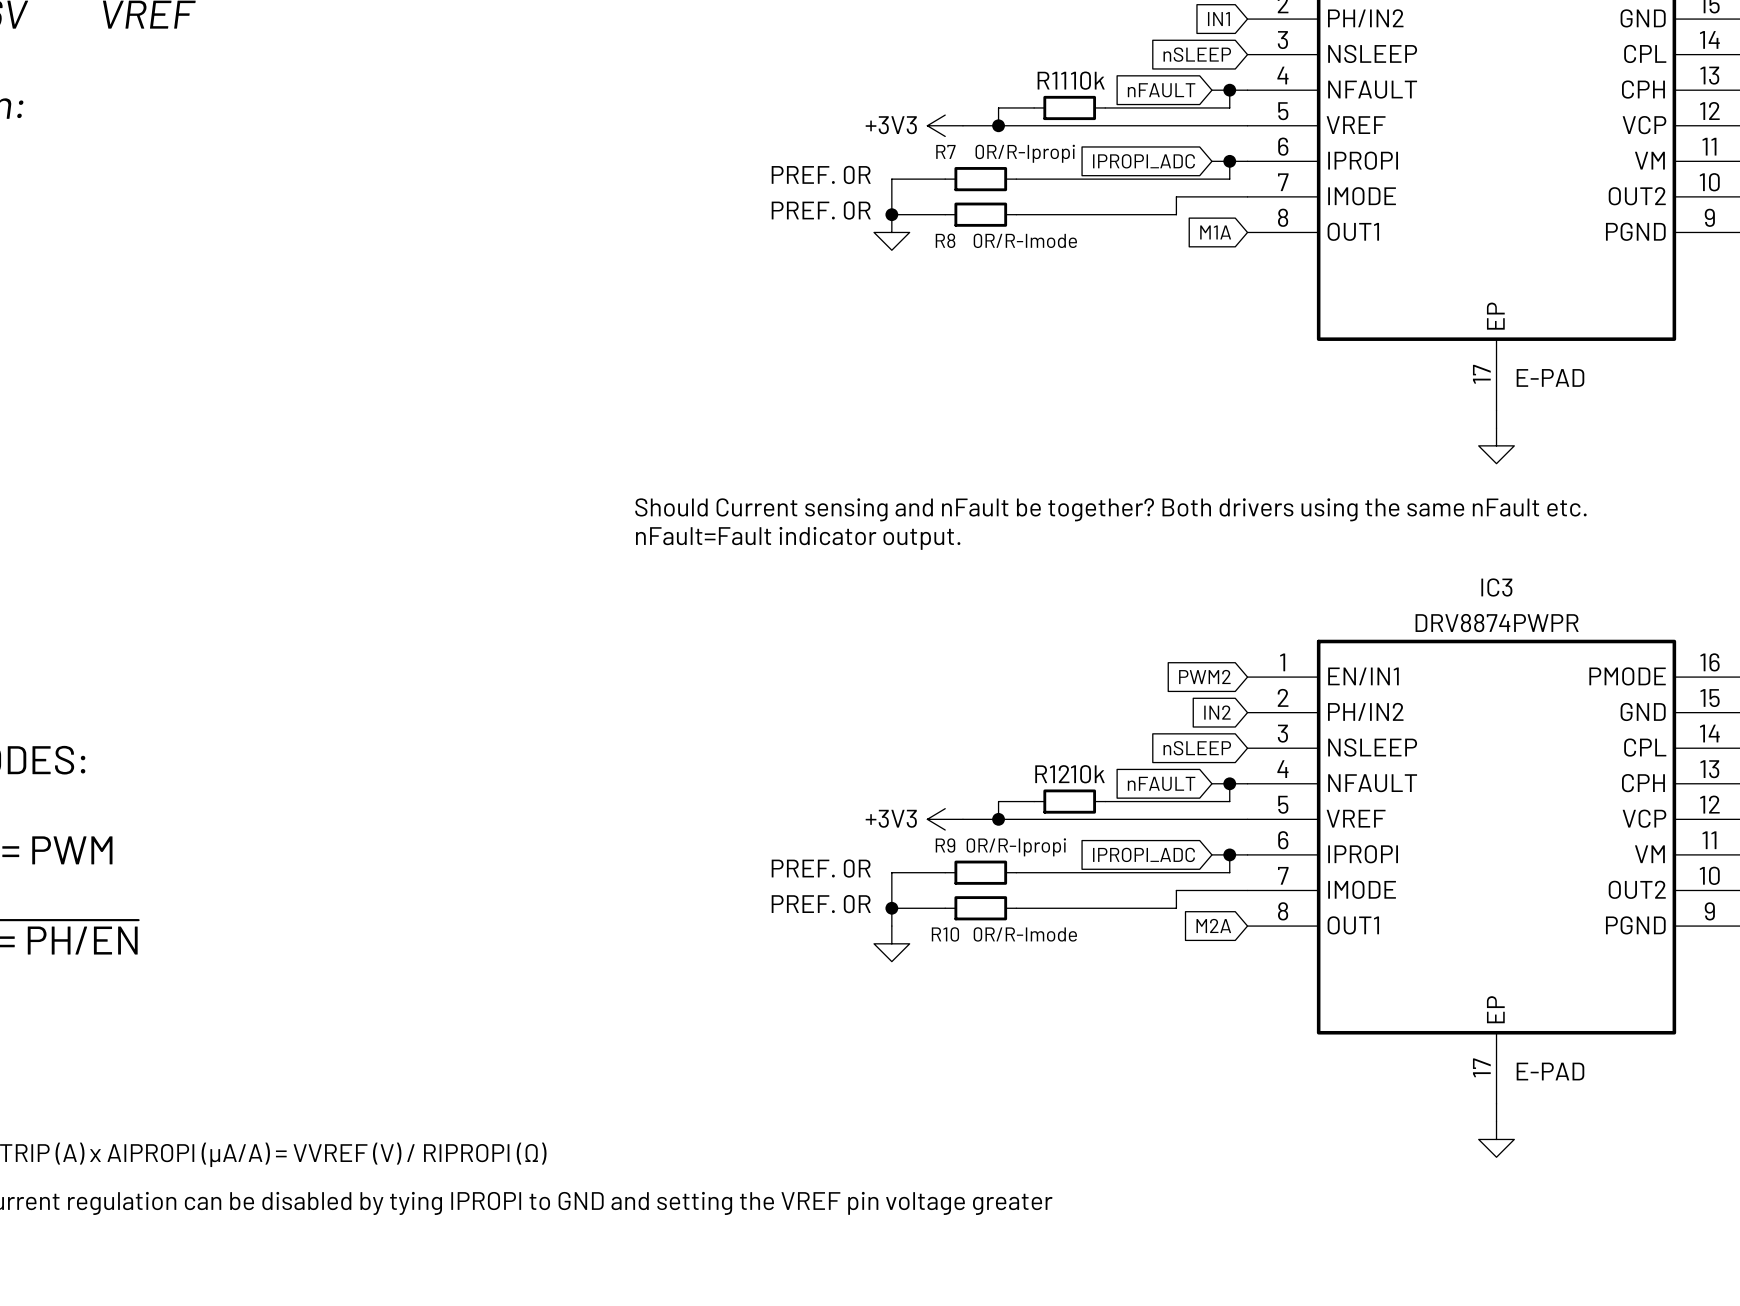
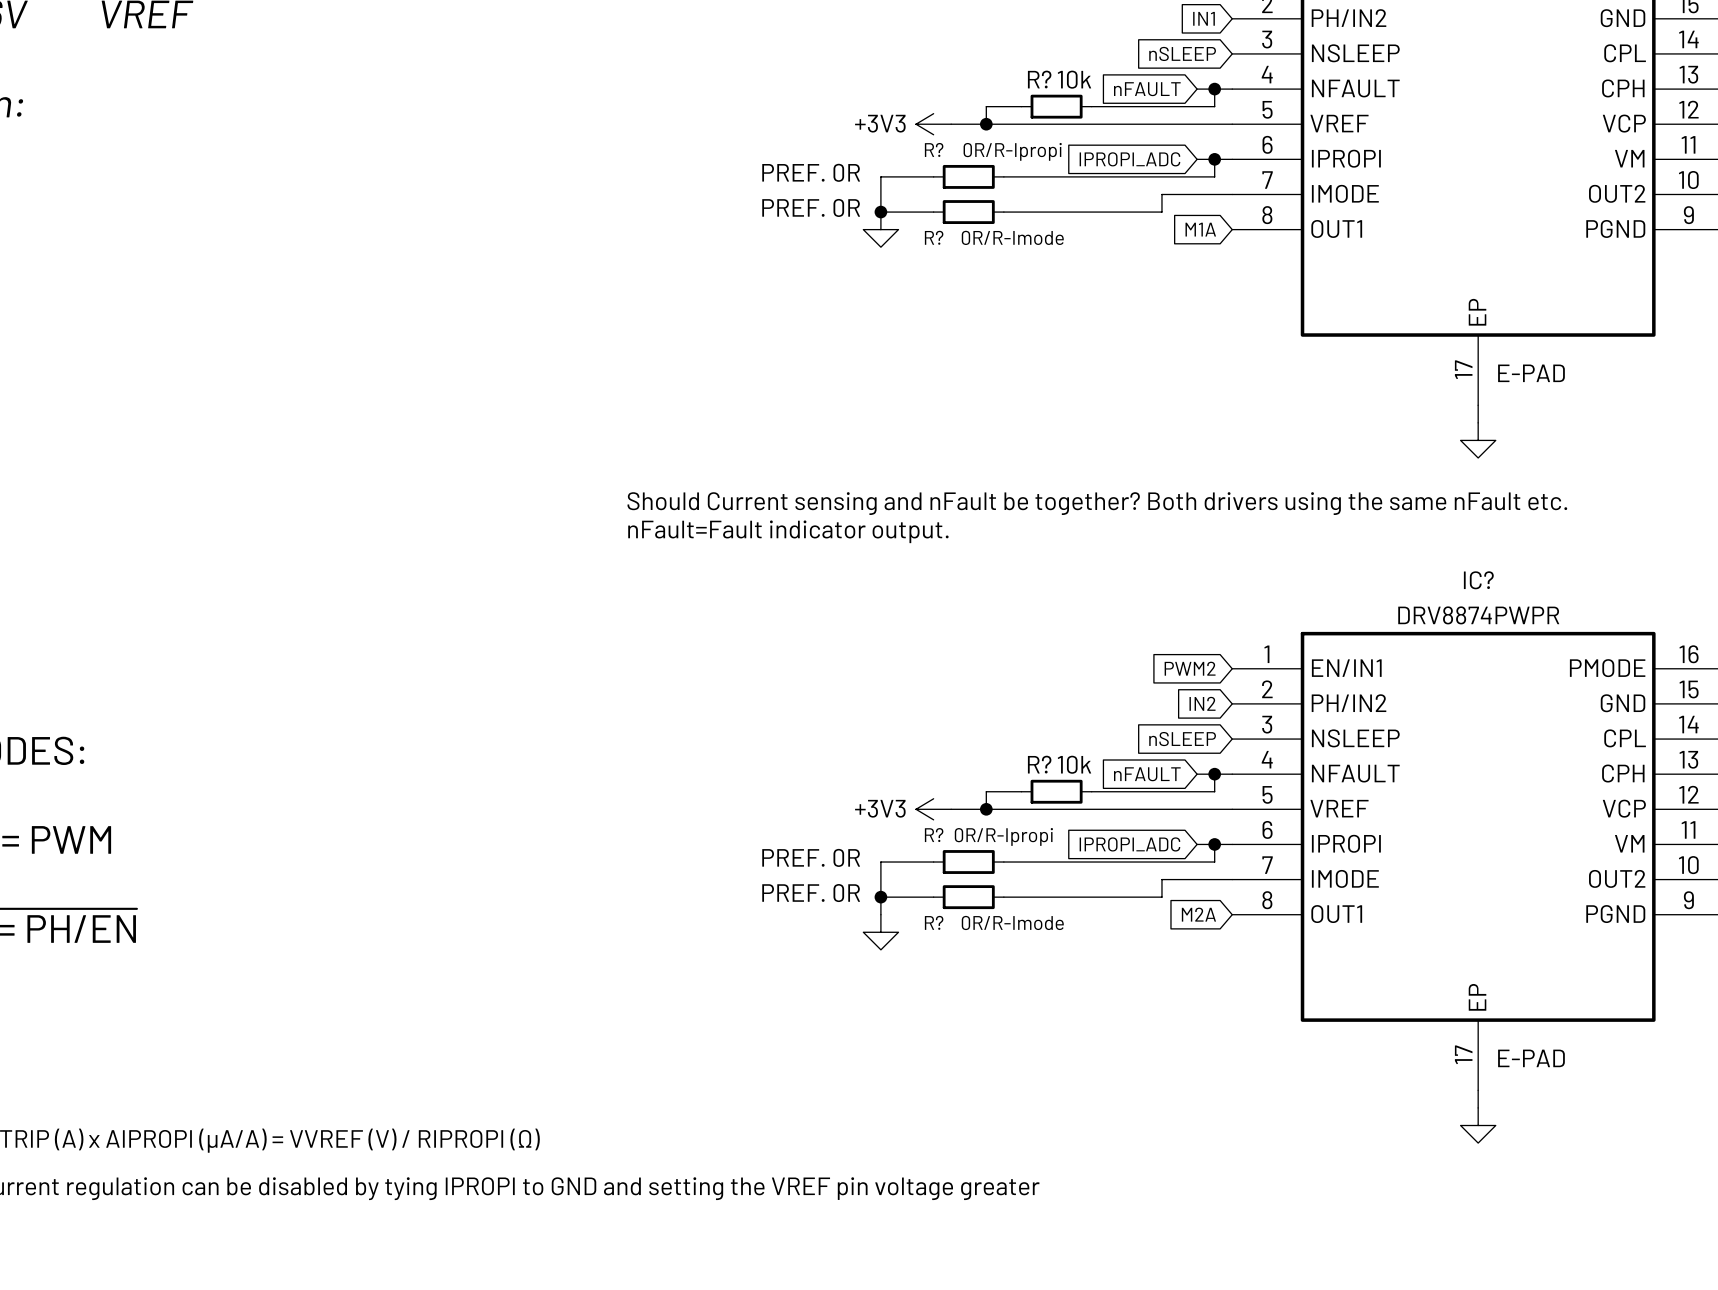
R11 name: R11 (1051, 80) -> R? (1039, 79)
R7 name: R7 (945, 151) -> R? (934, 149)
R8 name: R8 (945, 240) -> R? (934, 237)
IC3 name: IC3 (1496, 587) -> IC? (1478, 580)
R12 name: R12 (1052, 774) -> R? (1039, 764)
R9 name: R9 (945, 845) -> R? (934, 835)
R10 name: R10 (945, 934) -> R? (934, 922)

